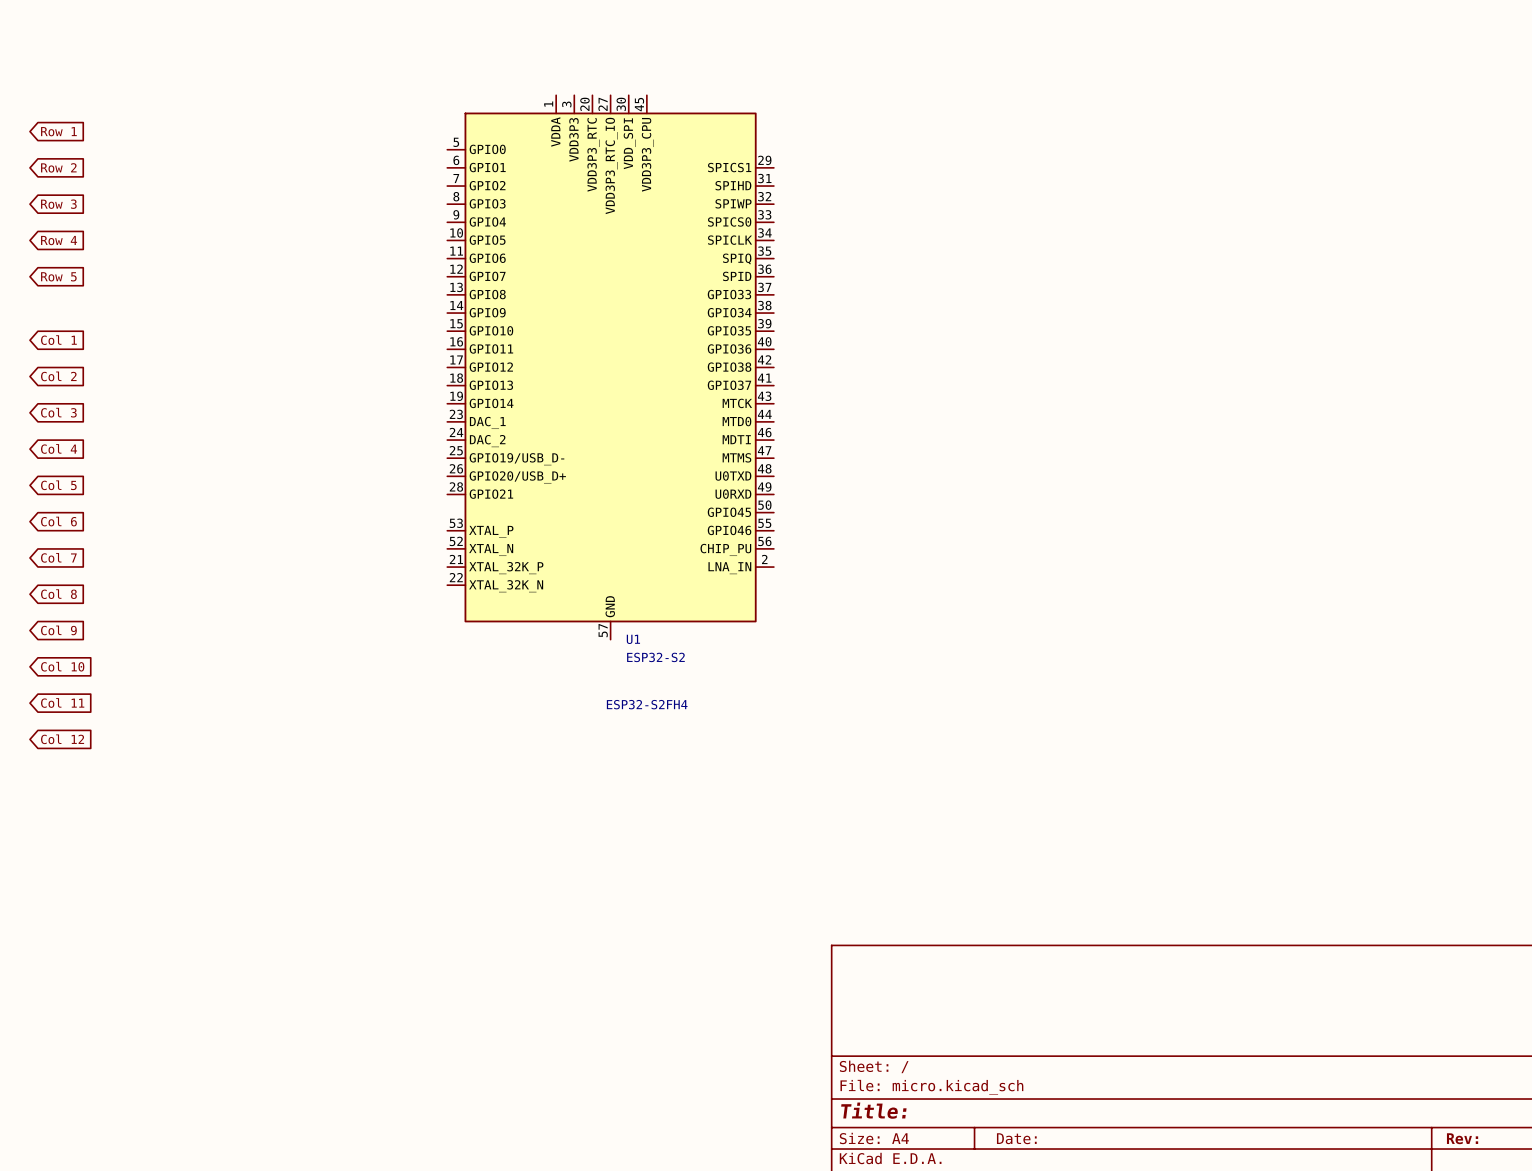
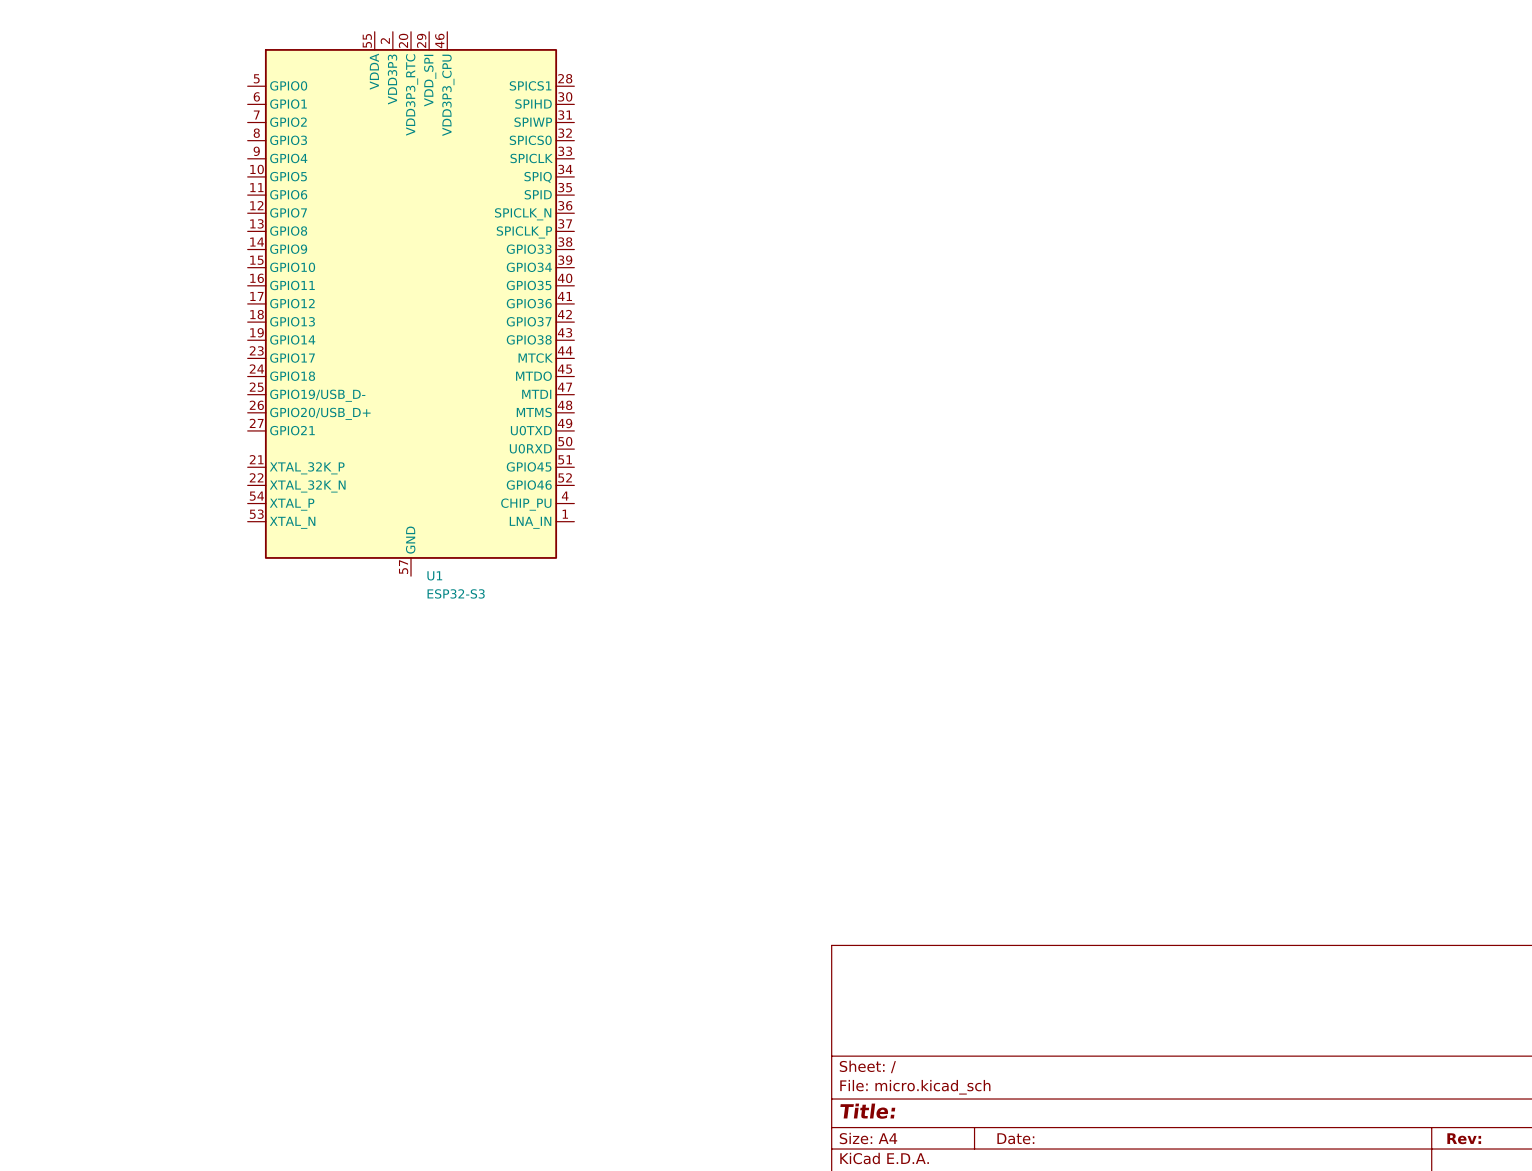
U1 symbol: [447, 95, 774, 640] -> [247, 31, 575, 577]
global label: Row 1 (58, 131) -> none
global label: Row 2 (58, 167) -> none
global label: Row 3 (58, 204) -> none
global label: Row 4 (59, 240) -> none
global label: Row 5 (58, 276) -> none
global label: Col 1 (58, 340) -> none
global label: Col 2 (58, 376) -> none
global label: Col 3 (58, 412) -> none
global label: Col 4 (59, 448) -> none
global label: Col 5 (58, 485) -> none
global label: Col 6 (58, 521) -> none
global label: Col 7 (58, 557) -> none
global label: Col 8 (58, 594) -> none
global label: Col 9 (58, 630) -> none
U1 value: ESP32-S2 (655, 657) -> ESP32-S3 (456, 593)
global label: Col 10 (62, 666) -> none
global label: Col 11 (62, 702) -> none
text: ESP32-S2FH4 (647, 704) -> none
global label: Col 12 (62, 739) -> none

